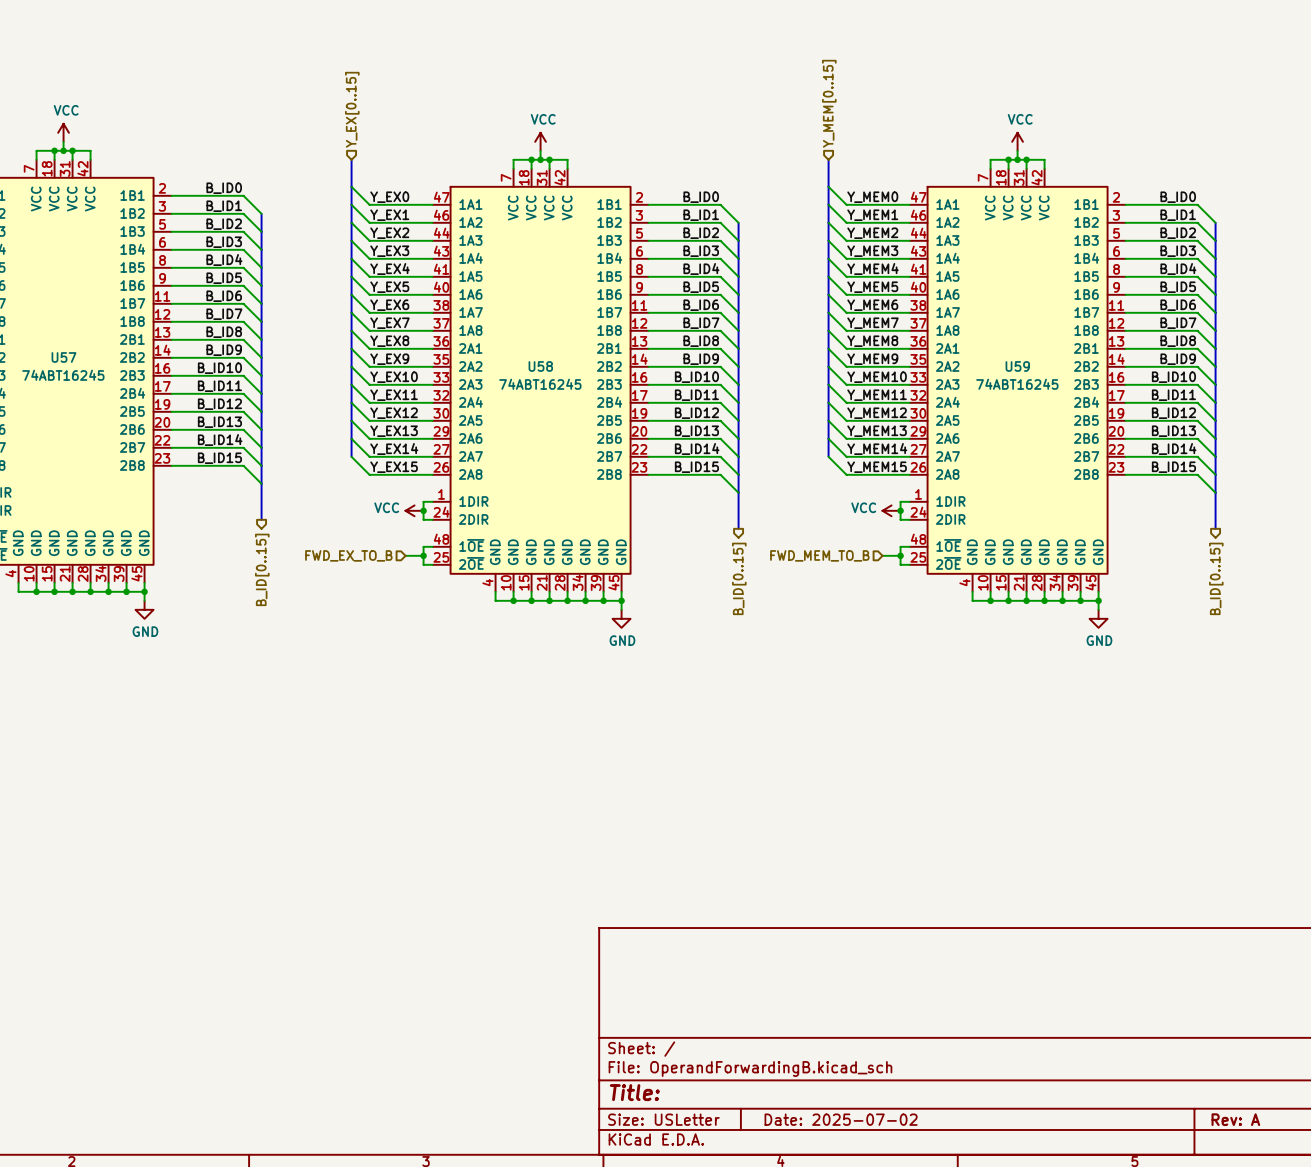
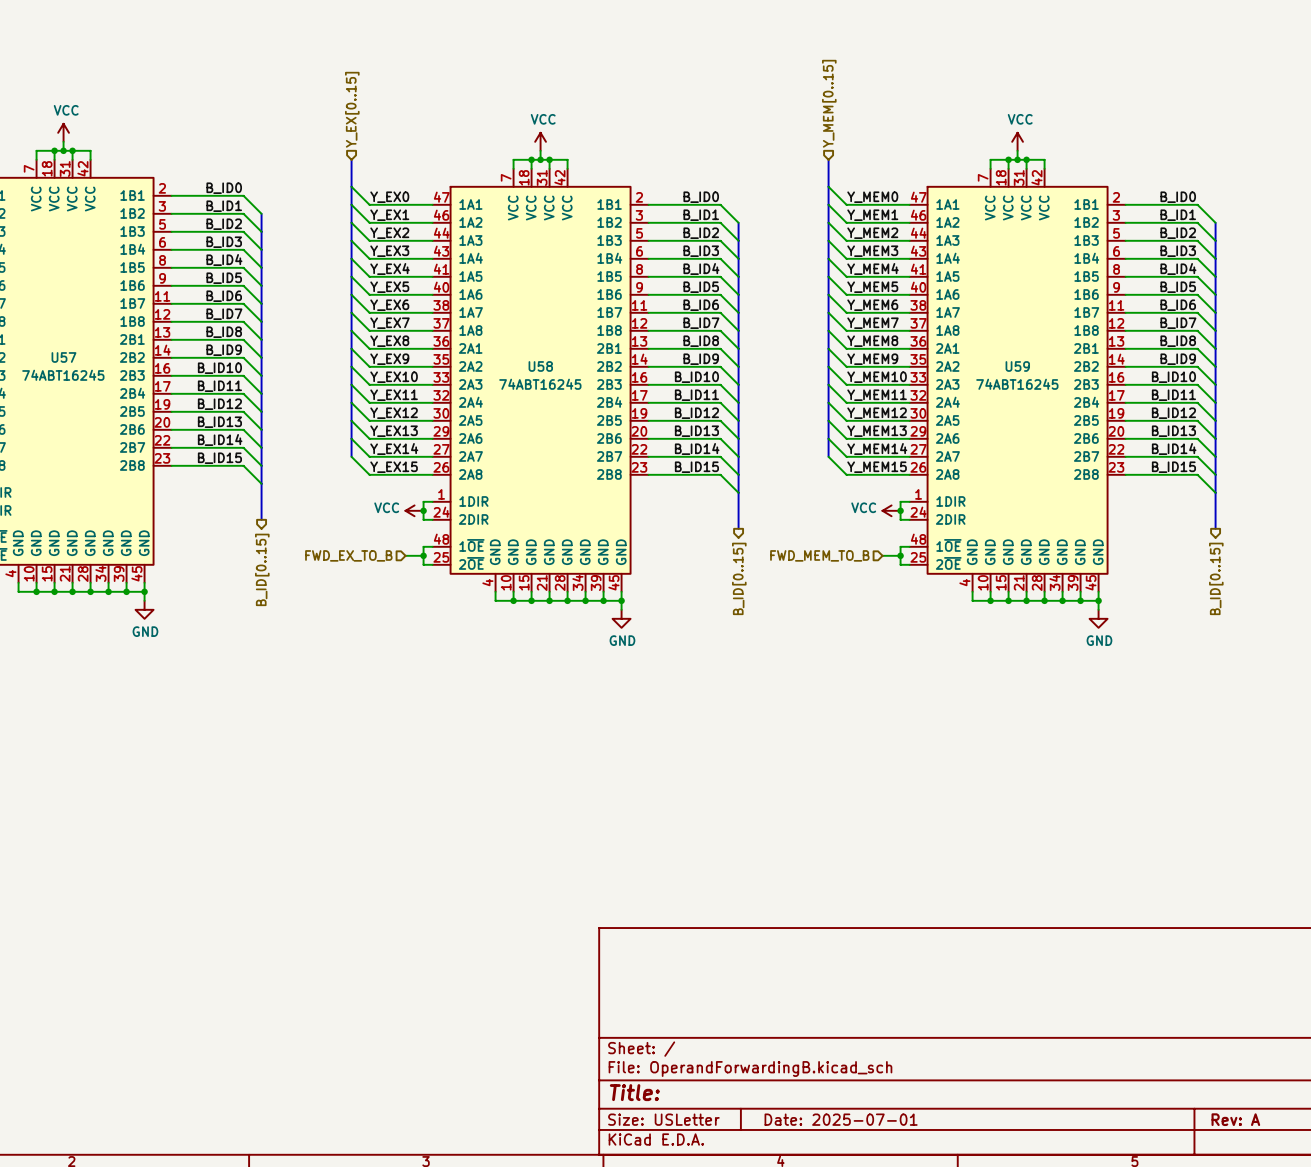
title block: Date: 2025-07-02 (841, 1119) -> Date: 2025-07-01 (841, 1119)

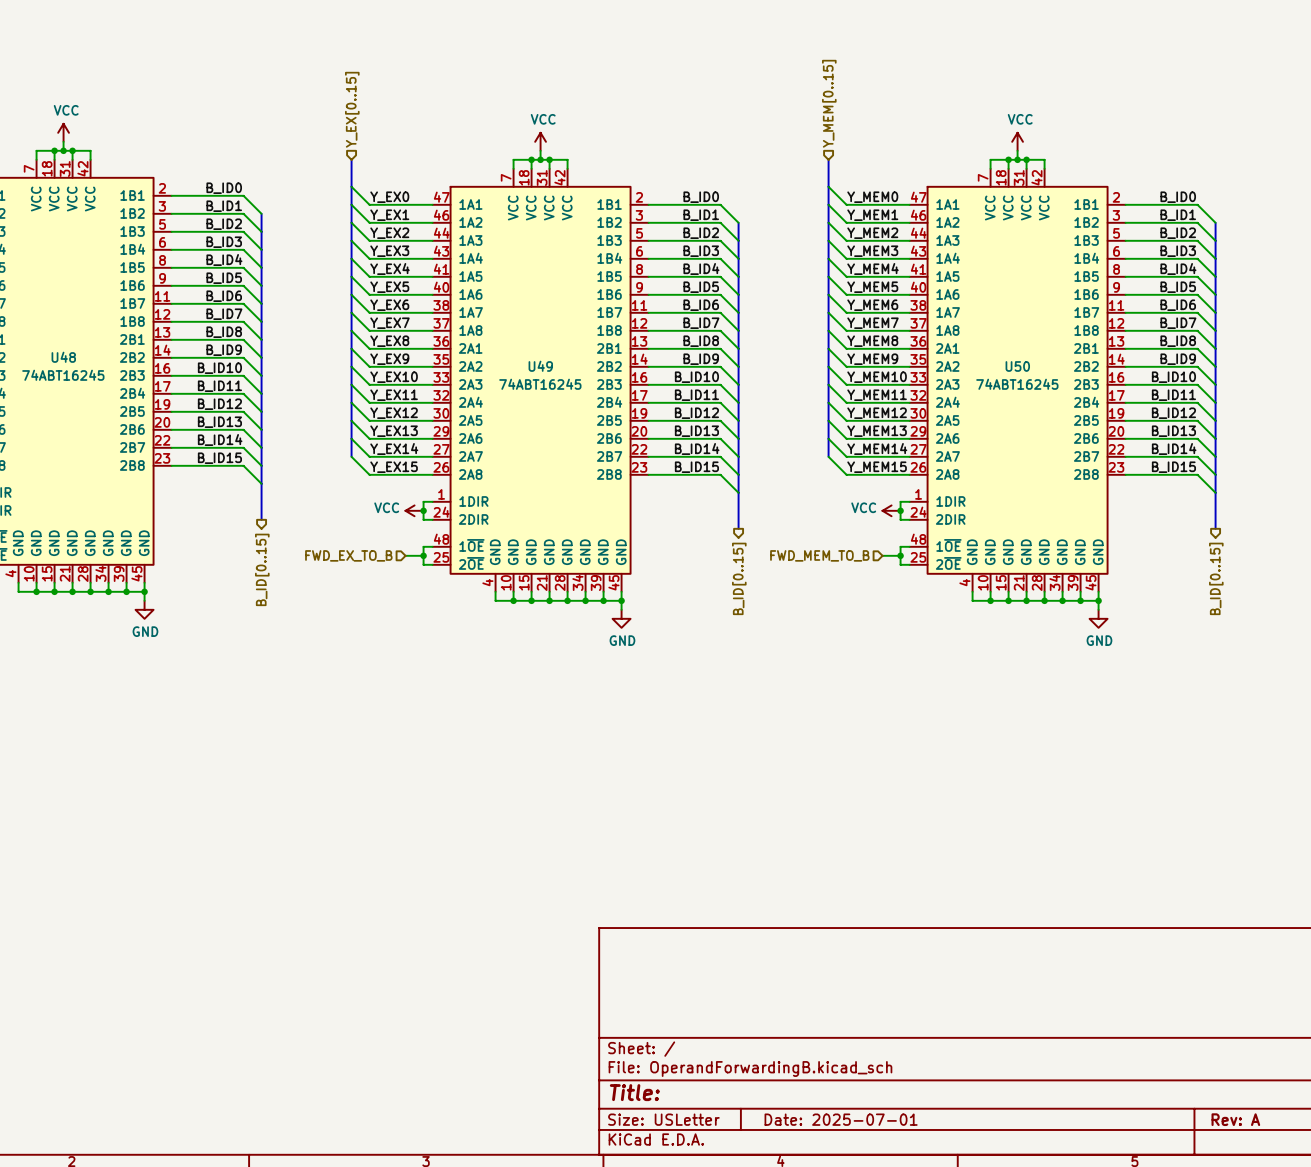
U57 name: U57 (63, 357) -> U48 (63, 357)
U58 name: U58 (540, 366) -> U49 (540, 366)
U59 name: U59 (1017, 366) -> U50 (1017, 366)

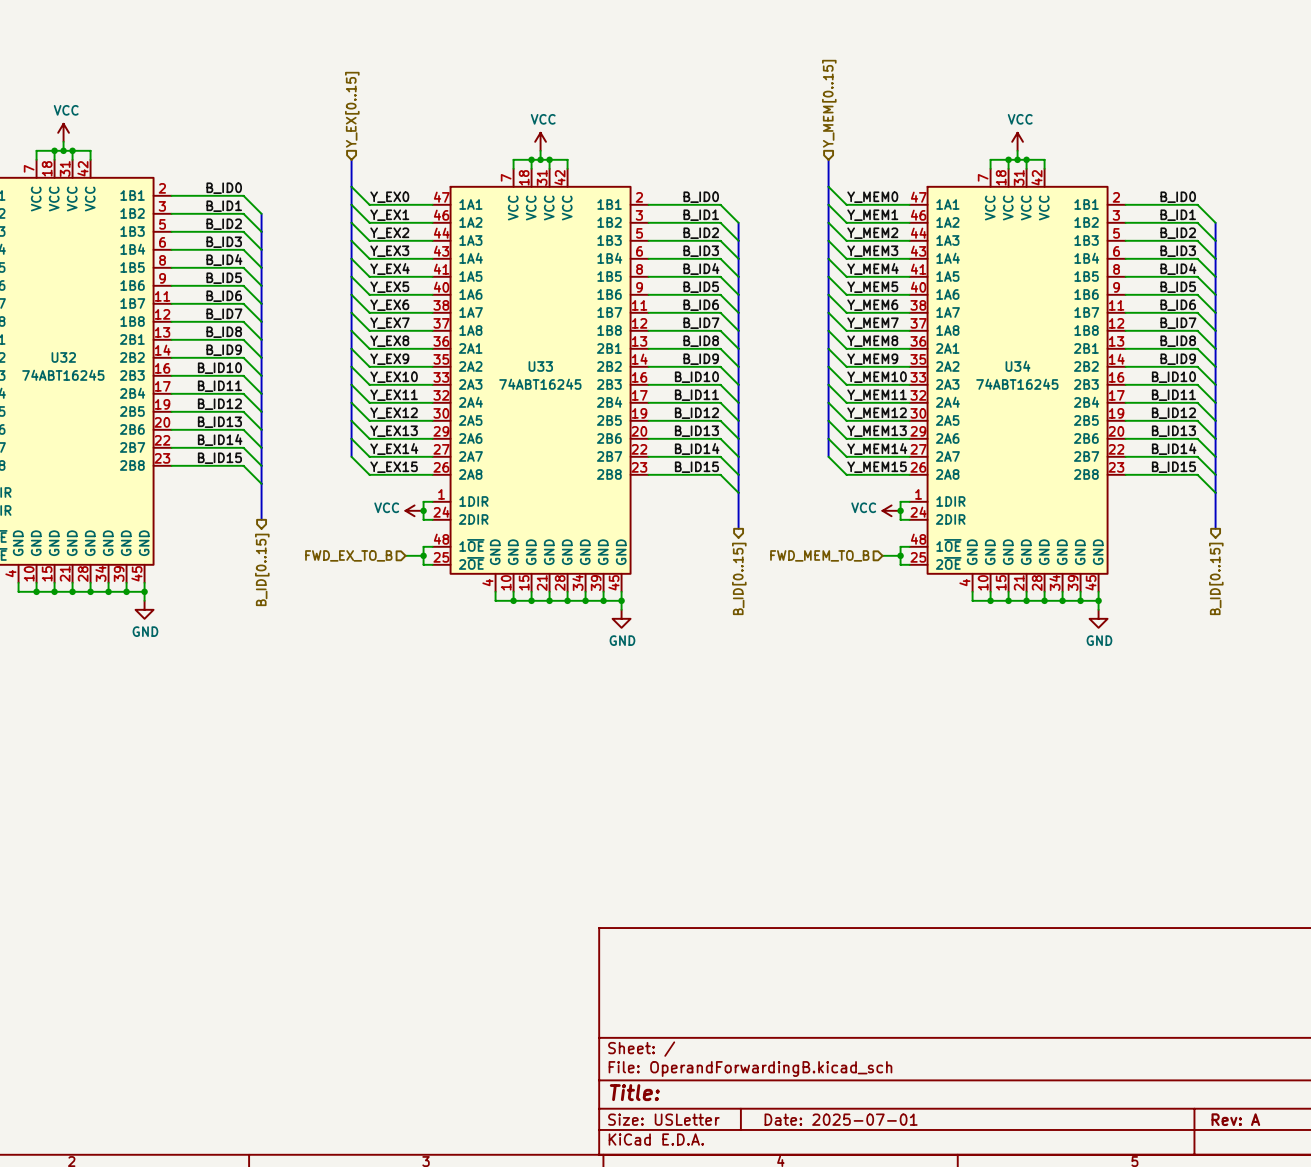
U48 name: U48 (63, 357) -> U32 (63, 357)
U49 name: U49 (540, 366) -> U33 (540, 366)
U50 name: U50 (1017, 366) -> U34 (1018, 366)

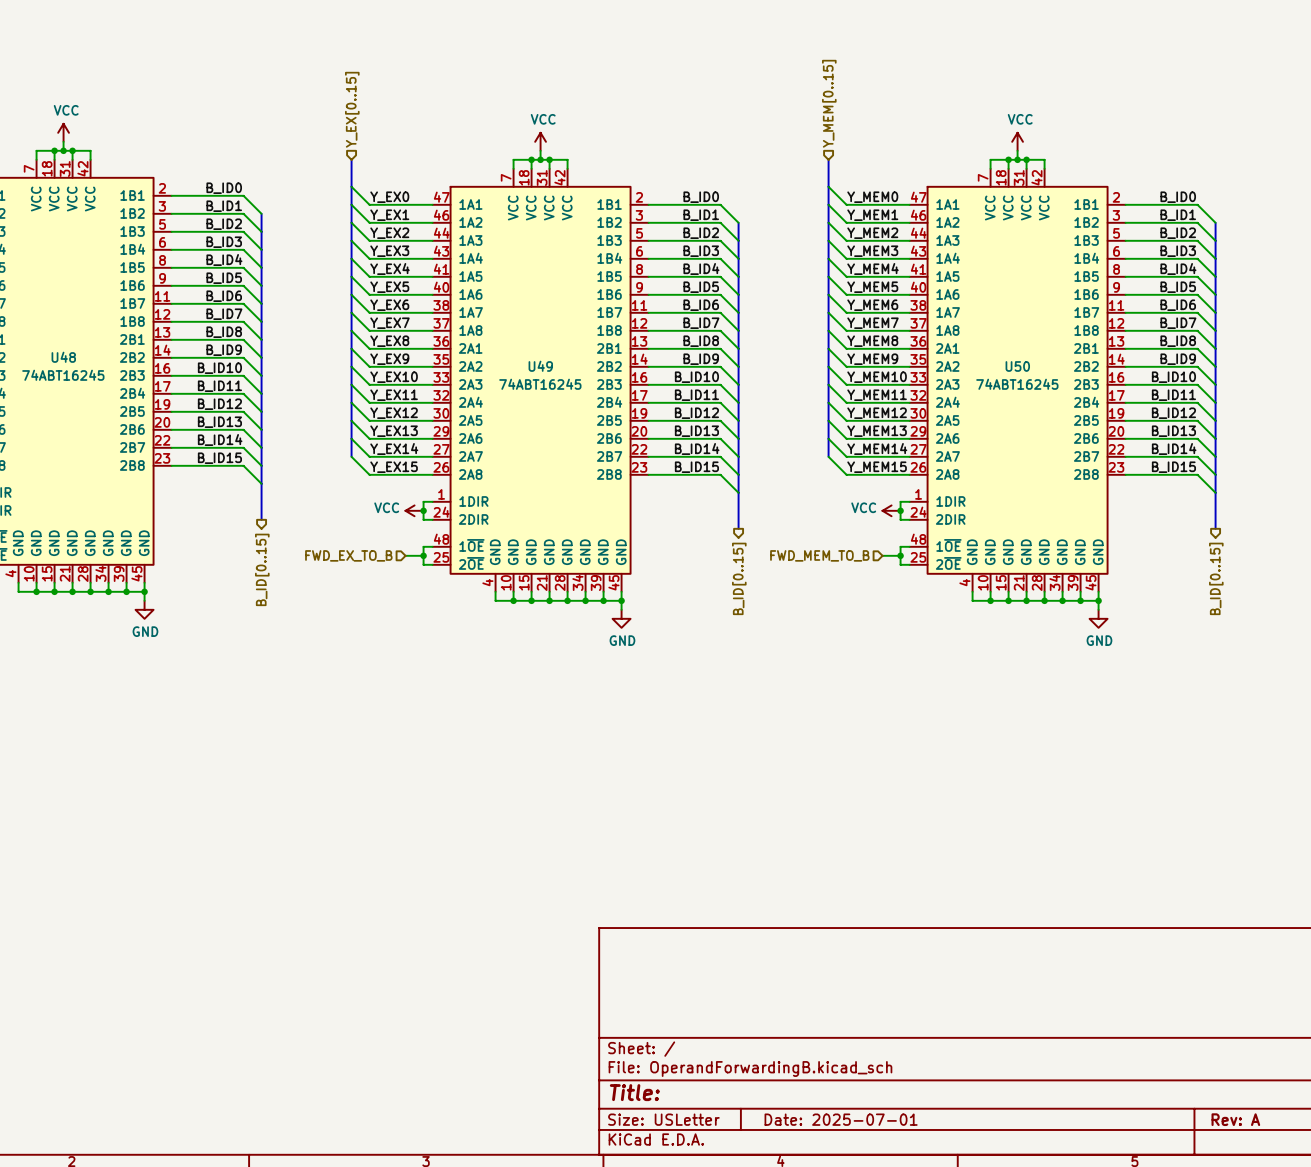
U32 name: U32 (63, 357) -> U48 (63, 357)
U33 name: U33 (540, 366) -> U49 (540, 366)
U34 name: U34 (1018, 366) -> U50 (1017, 366)

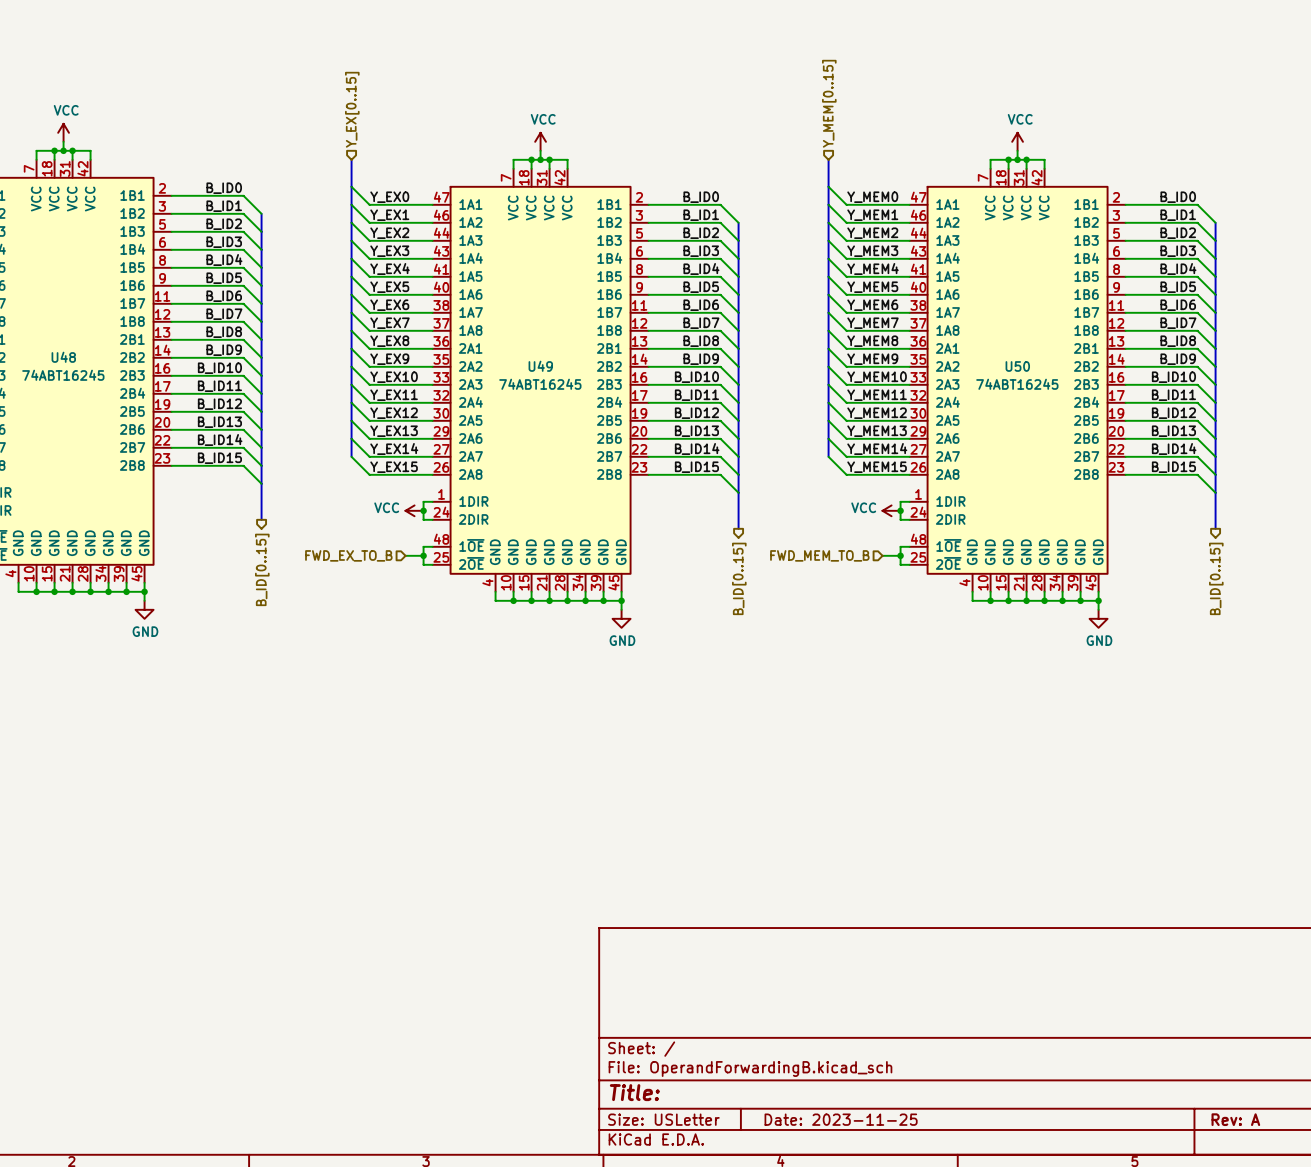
title block: Date: 2025-07-01 (841, 1119) -> Date: 2023-11-25 (841, 1119)

